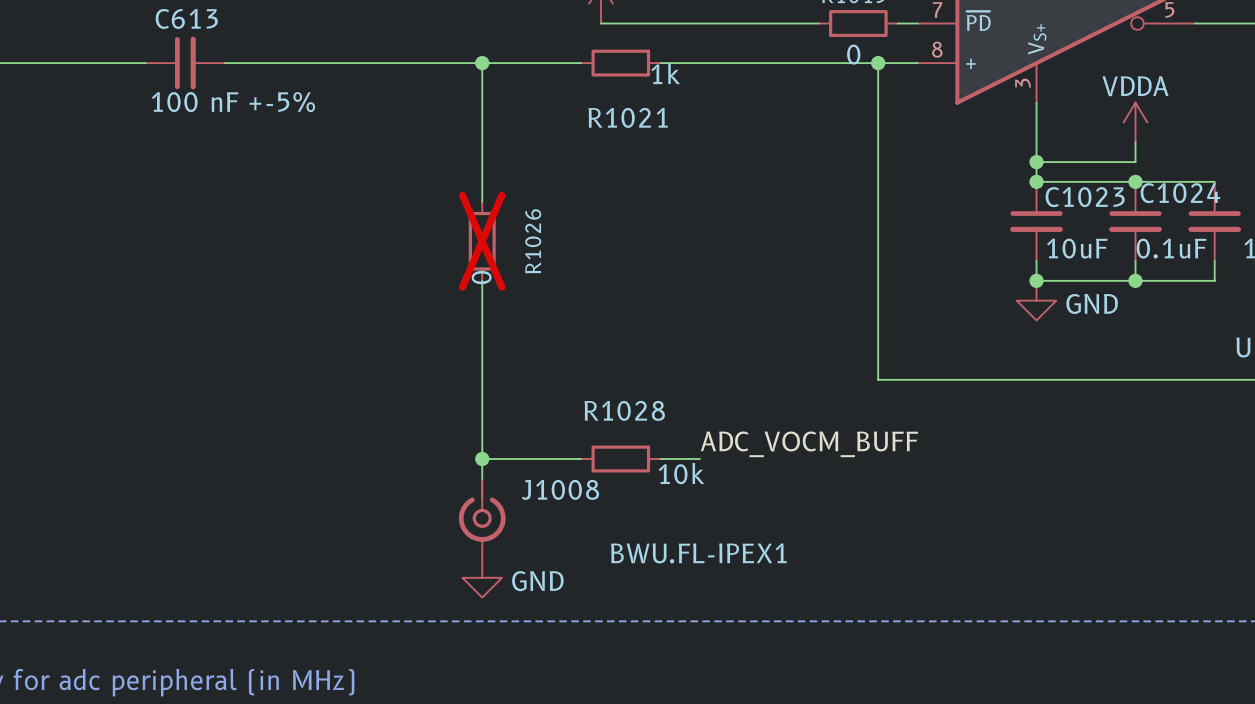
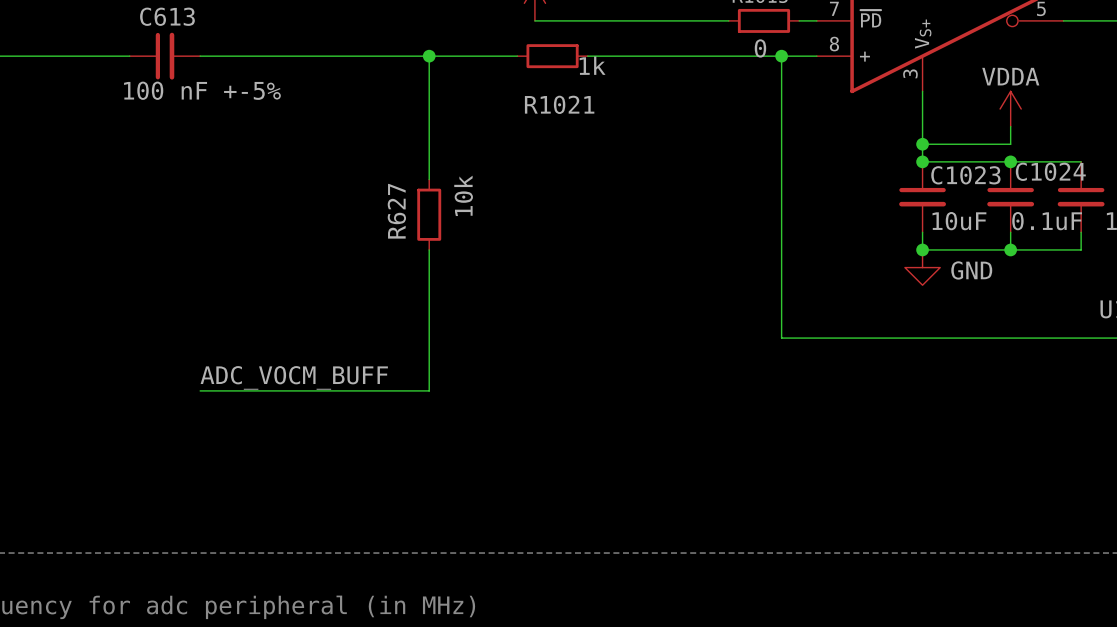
R1026 do-not-place cross: (482, 241) -> none
R1026 name: R1026 (533, 241) -> R627 (396, 211)
R1026 value: 0 (481, 277) -> 10k (463, 195)
label: none -> ADC_VOCM_BUFF (294, 377)
wire: (482, 439) (482, 478) -> (429, 390) (200, 390)
label: ADC_VOCM_BUFF (809, 444) -> none
wire: (482, 459) (581, 459) -> none
junction: (482, 459) -> none
R1028: 10k (620, 459) -> none
wire: (660, 459) (700, 459) -> none
J1008: BWU.FL-IPEX1 (482, 518) -> none
power symbol: GND (482, 577) -> none

